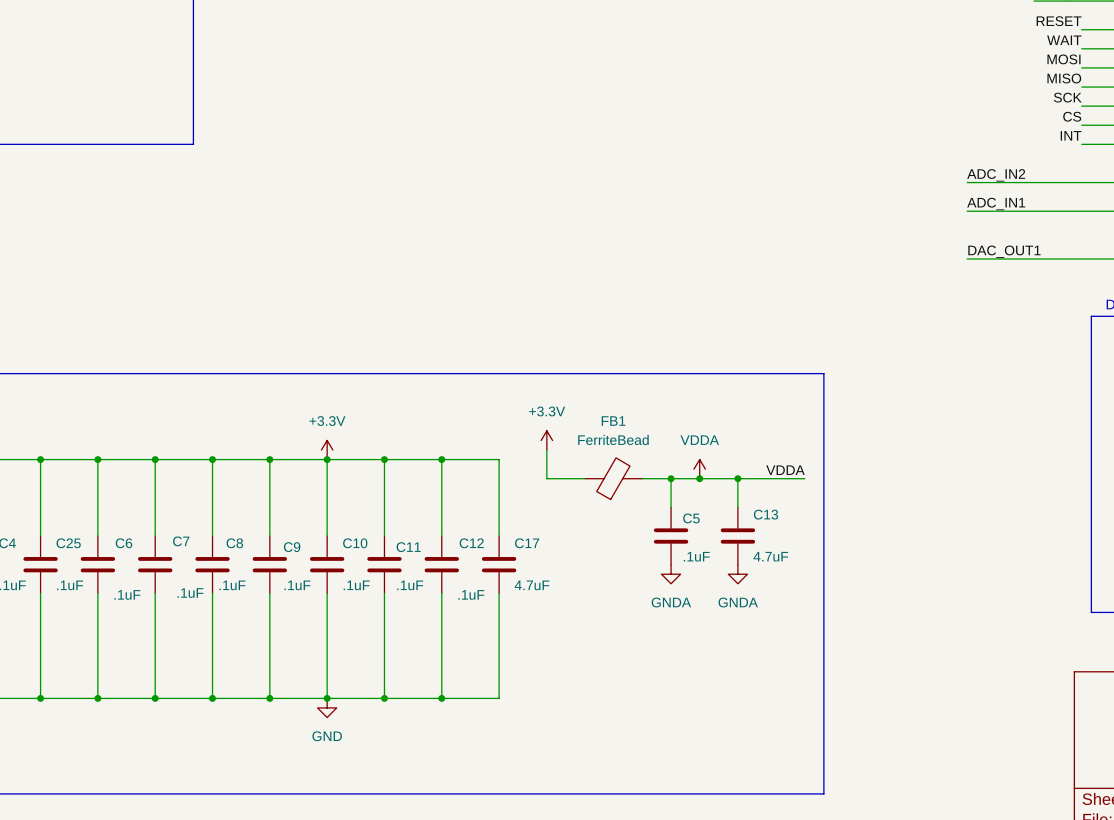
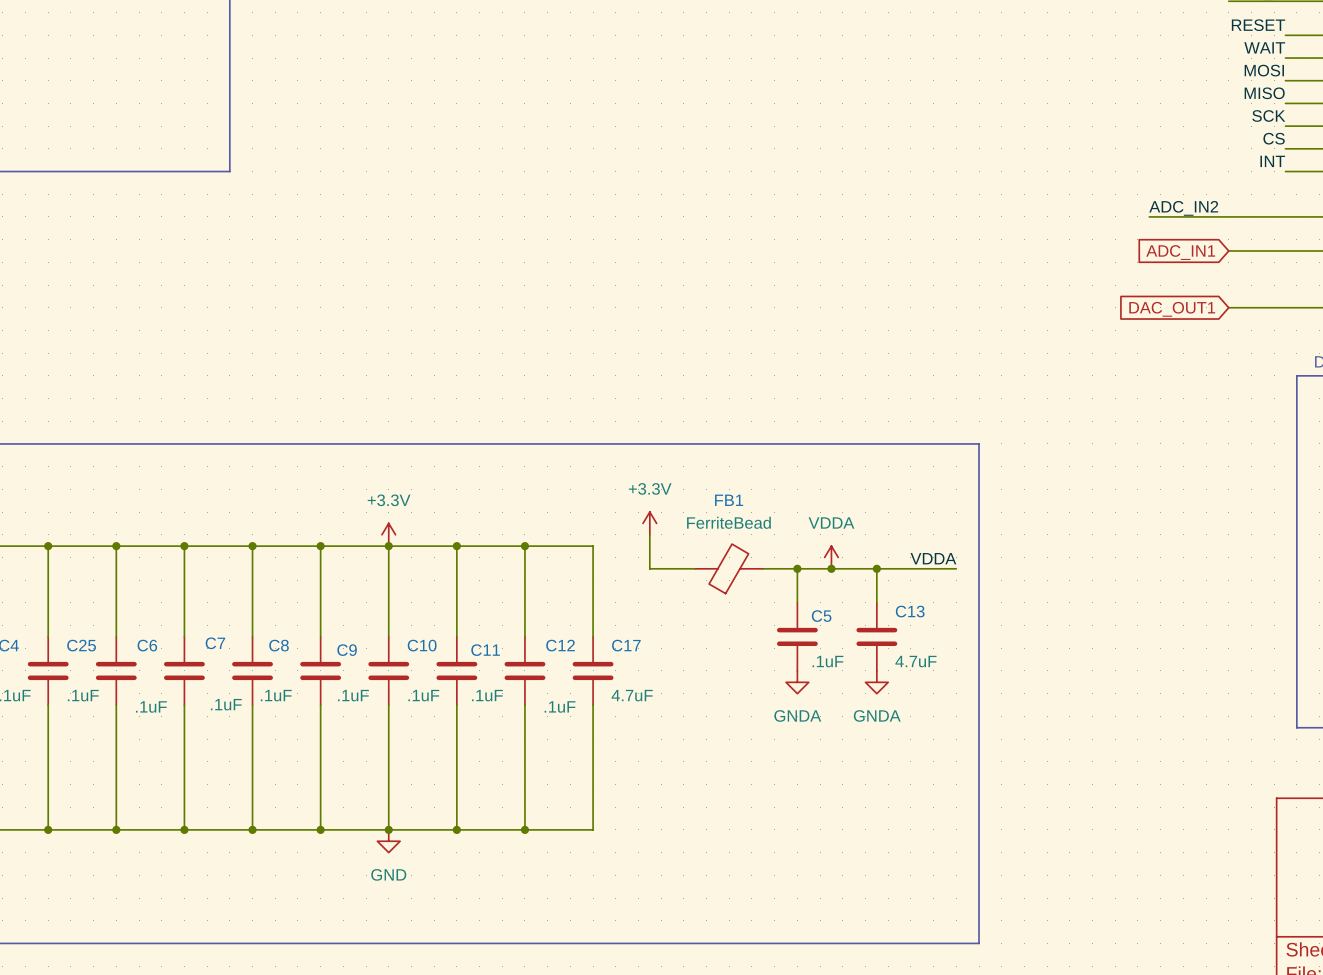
label: ADC_IN1 (996, 204) -> none
wire: (967, 211) (1034, 211) -> none
global label: none -> ADC_IN1 (1180, 252)
label: DAC_OUT1 (1004, 251) -> none
wire: (967, 258) (1034, 258) -> none
global label: none -> DAC_OUT1 (1172, 309)

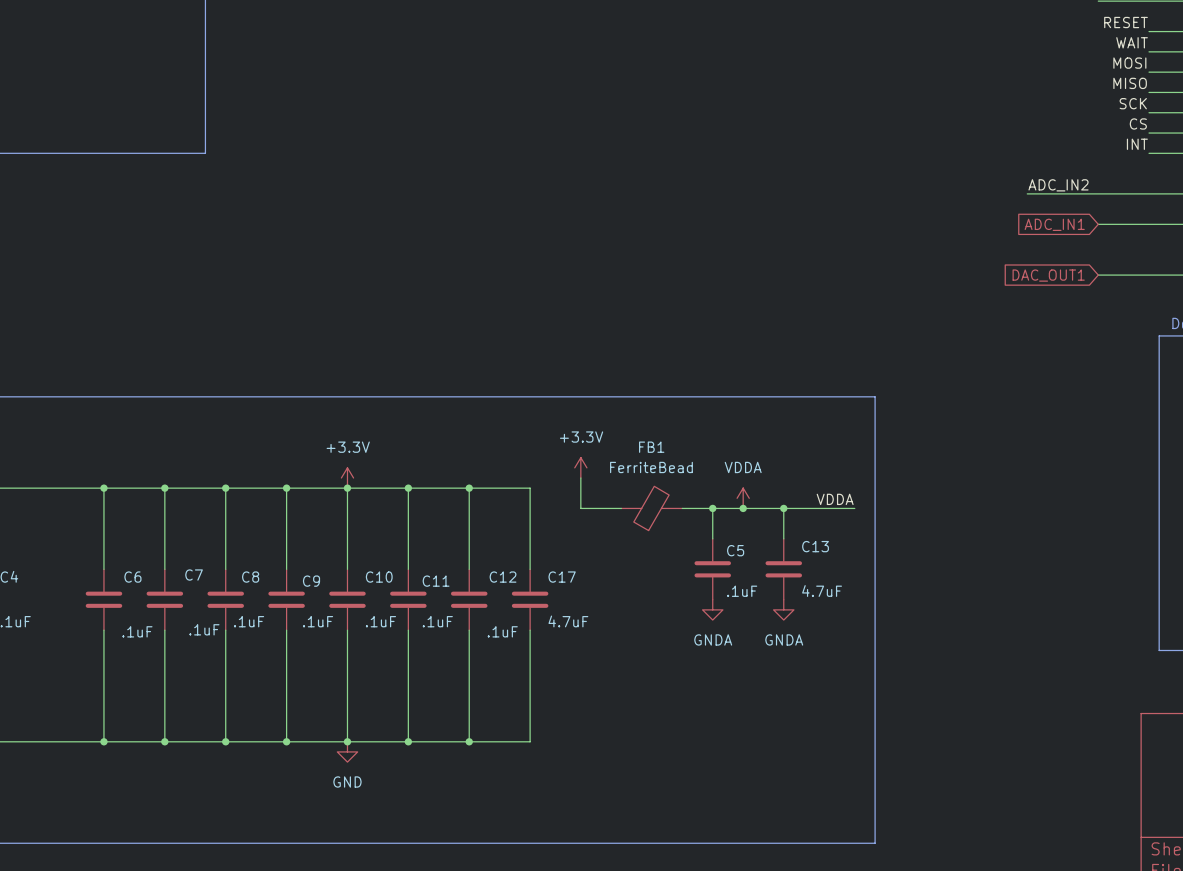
wire: (48, 546) (48, 636) -> none
junction: (48, 546) -> none
C25: .1uF (48, 670) -> none
wire: (48, 705) (48, 829) -> none
junction: (48, 829) -> none

